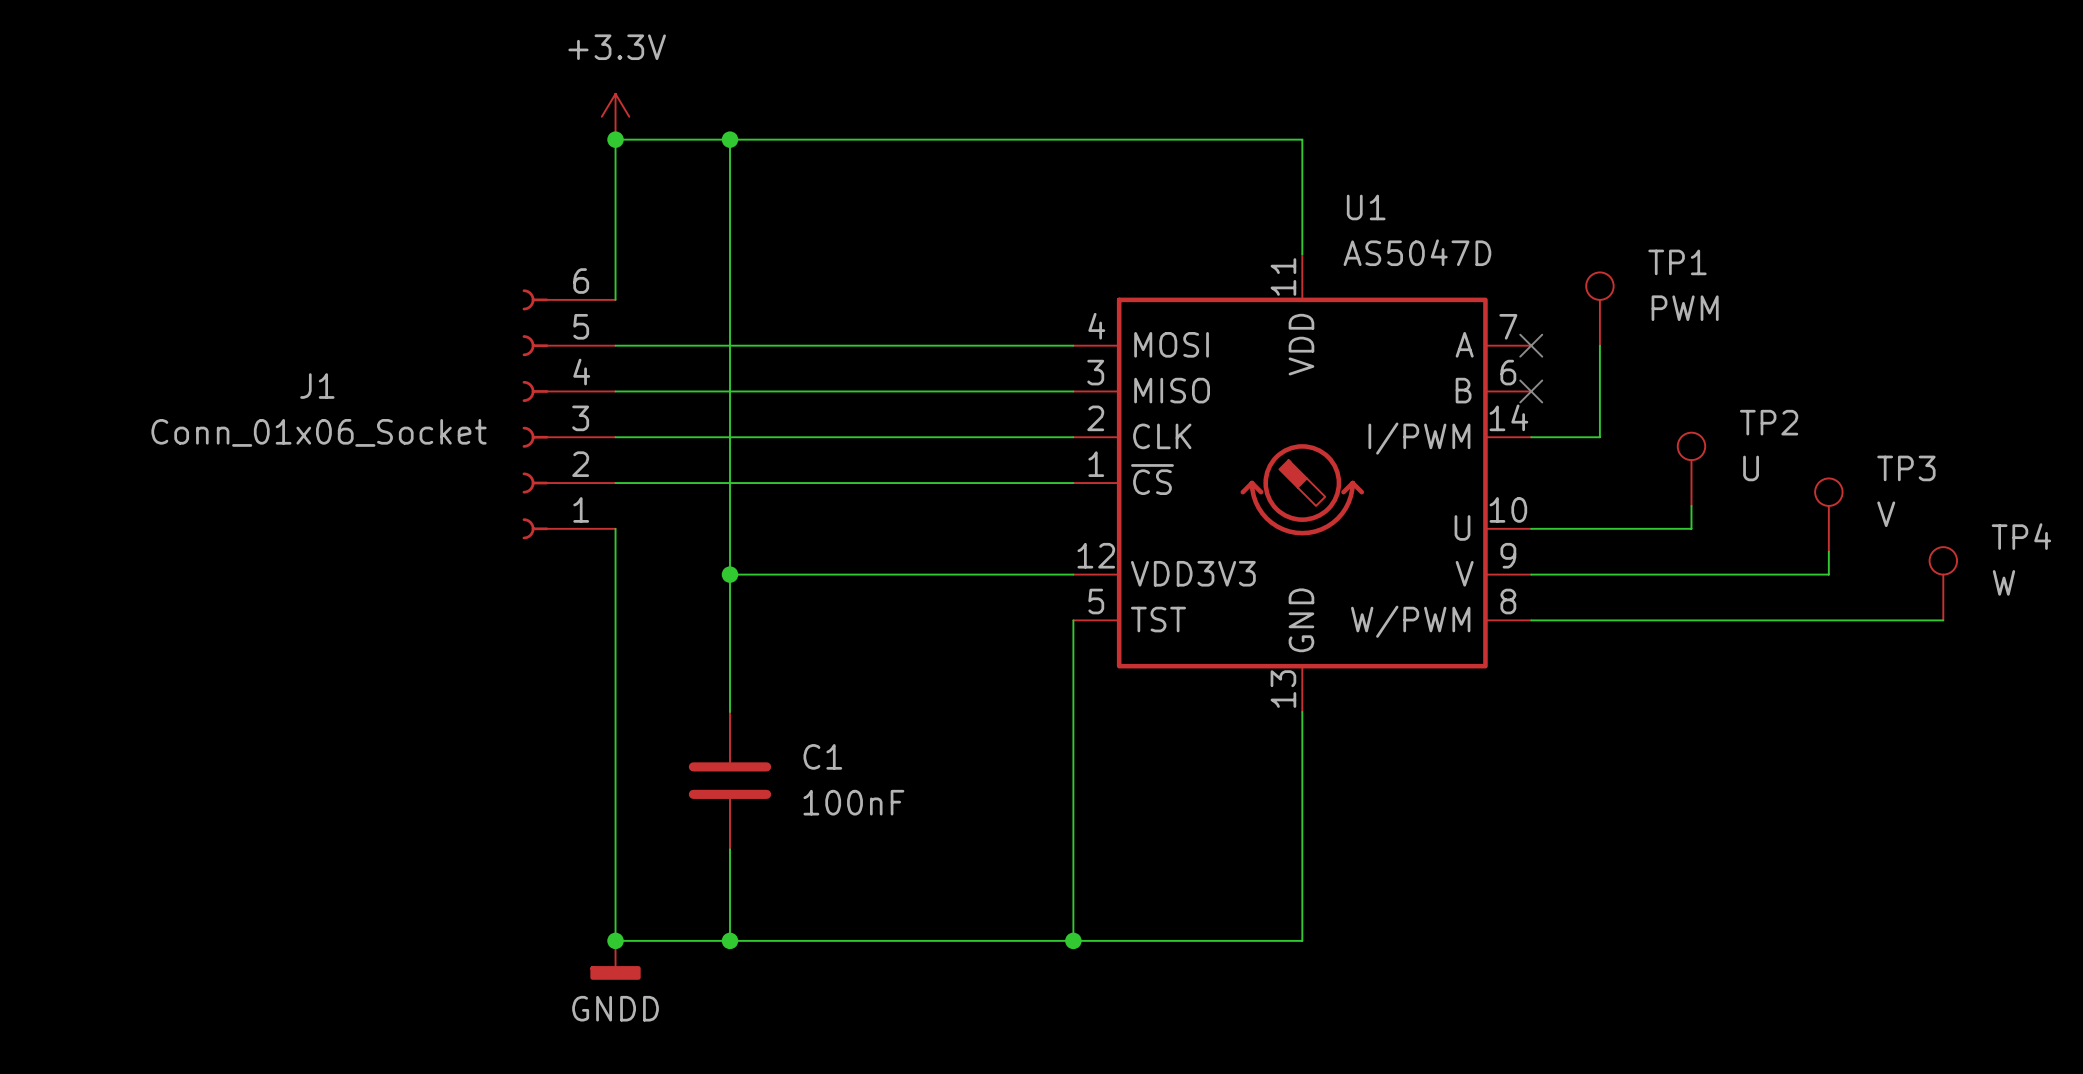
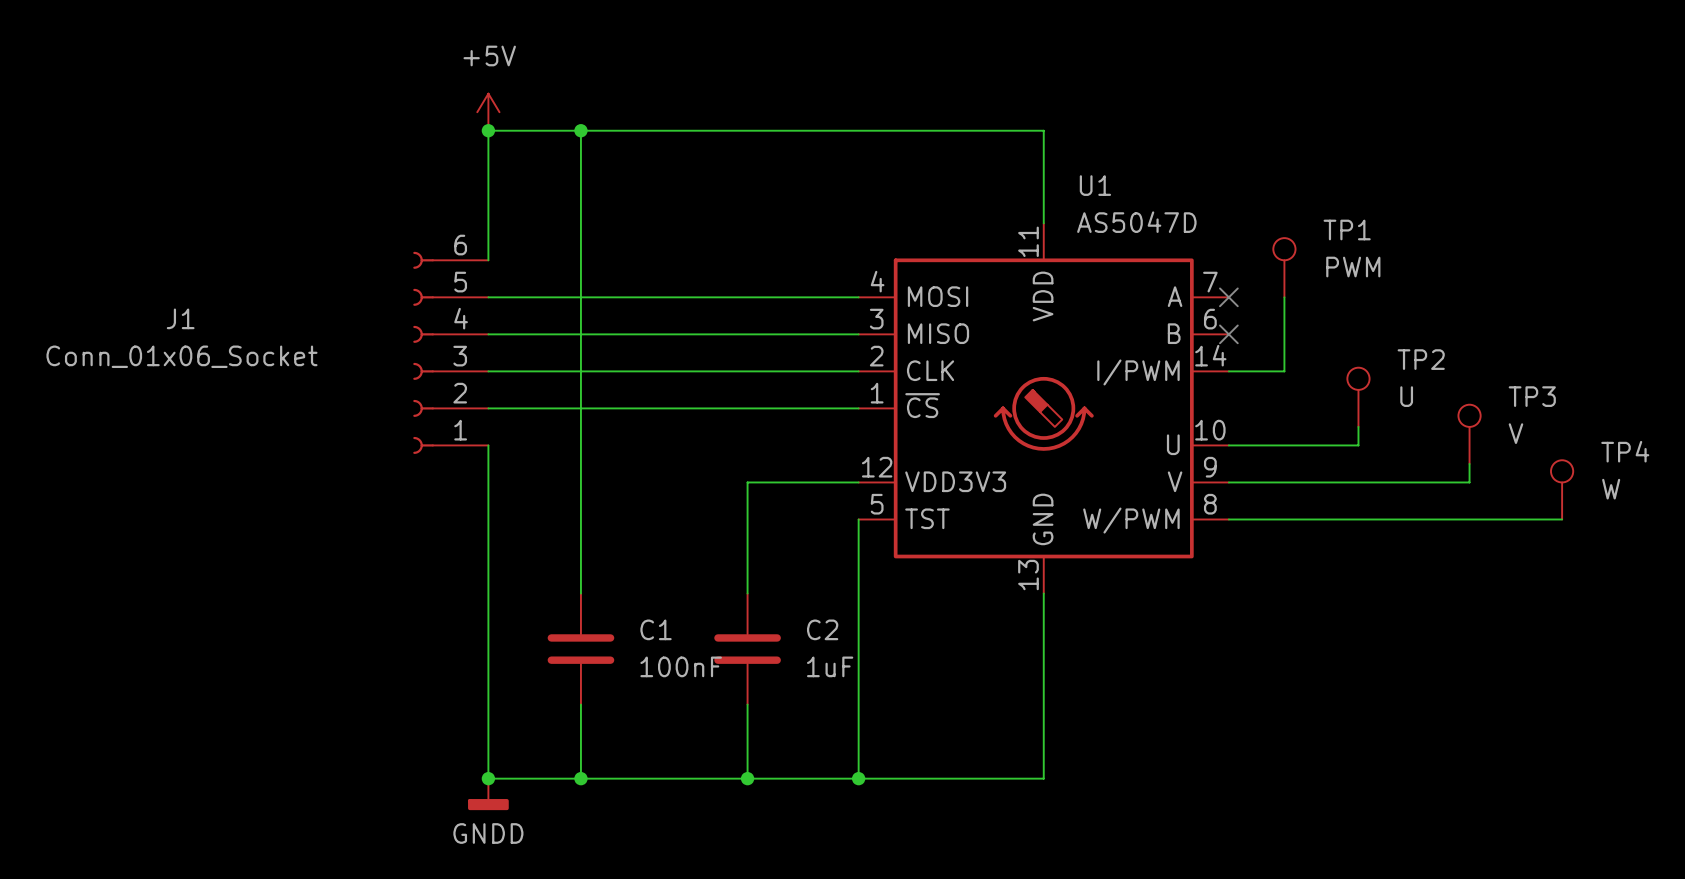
power symbol: +3.3V (615, 116) -> +5V (488, 112)
J1 name position: J1 (317, 386) -> J1 (180, 318)
J1 value position: Conn_01x06_Socket (319, 432) -> Conn_01x06_Socket (181, 356)
wire: (729, 574) (936, 574) -> (747, 593) (747, 482)
junction: (729, 574) -> none
C2: none -> 1uF (747, 649)
wire: none -> (747, 704) (747, 778)
junction: none -> (747, 778)

